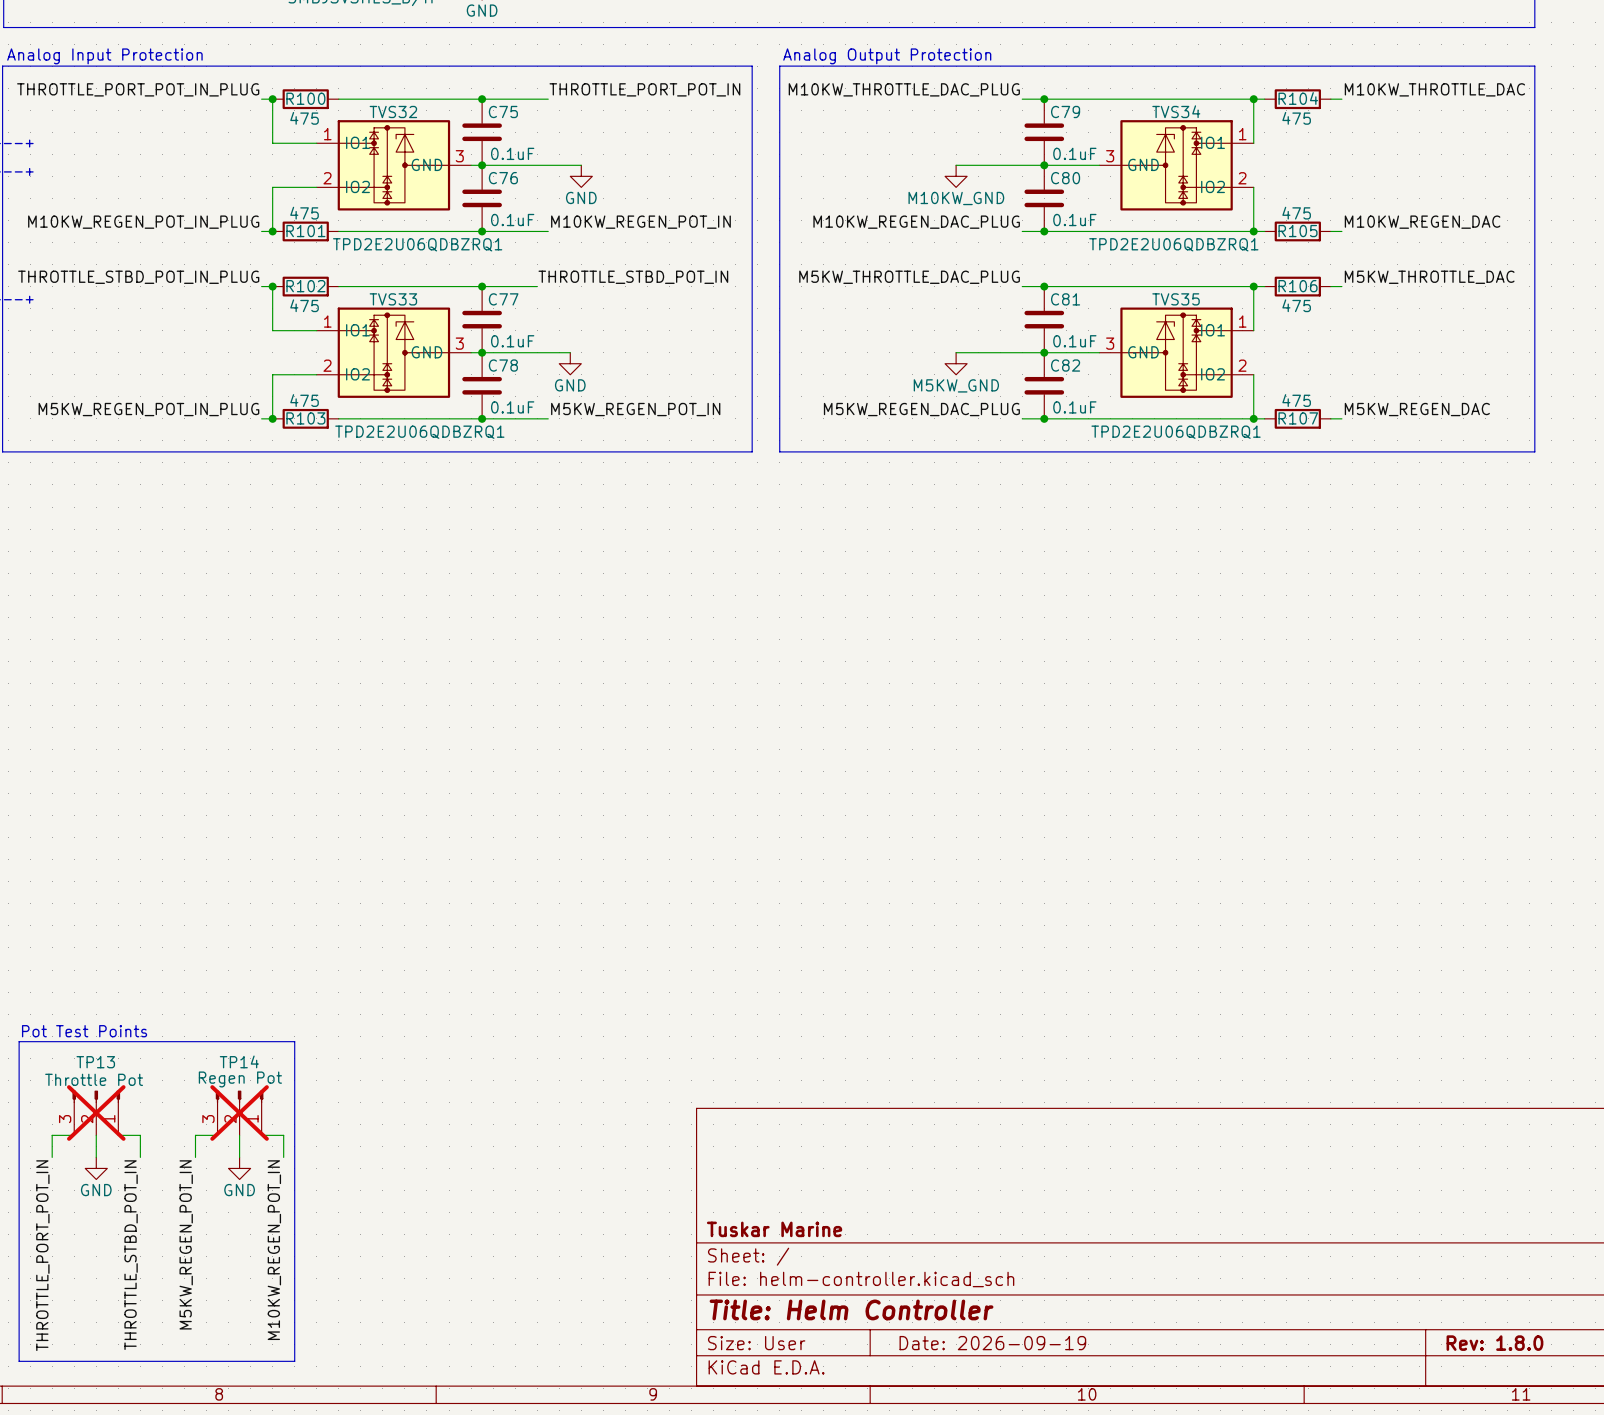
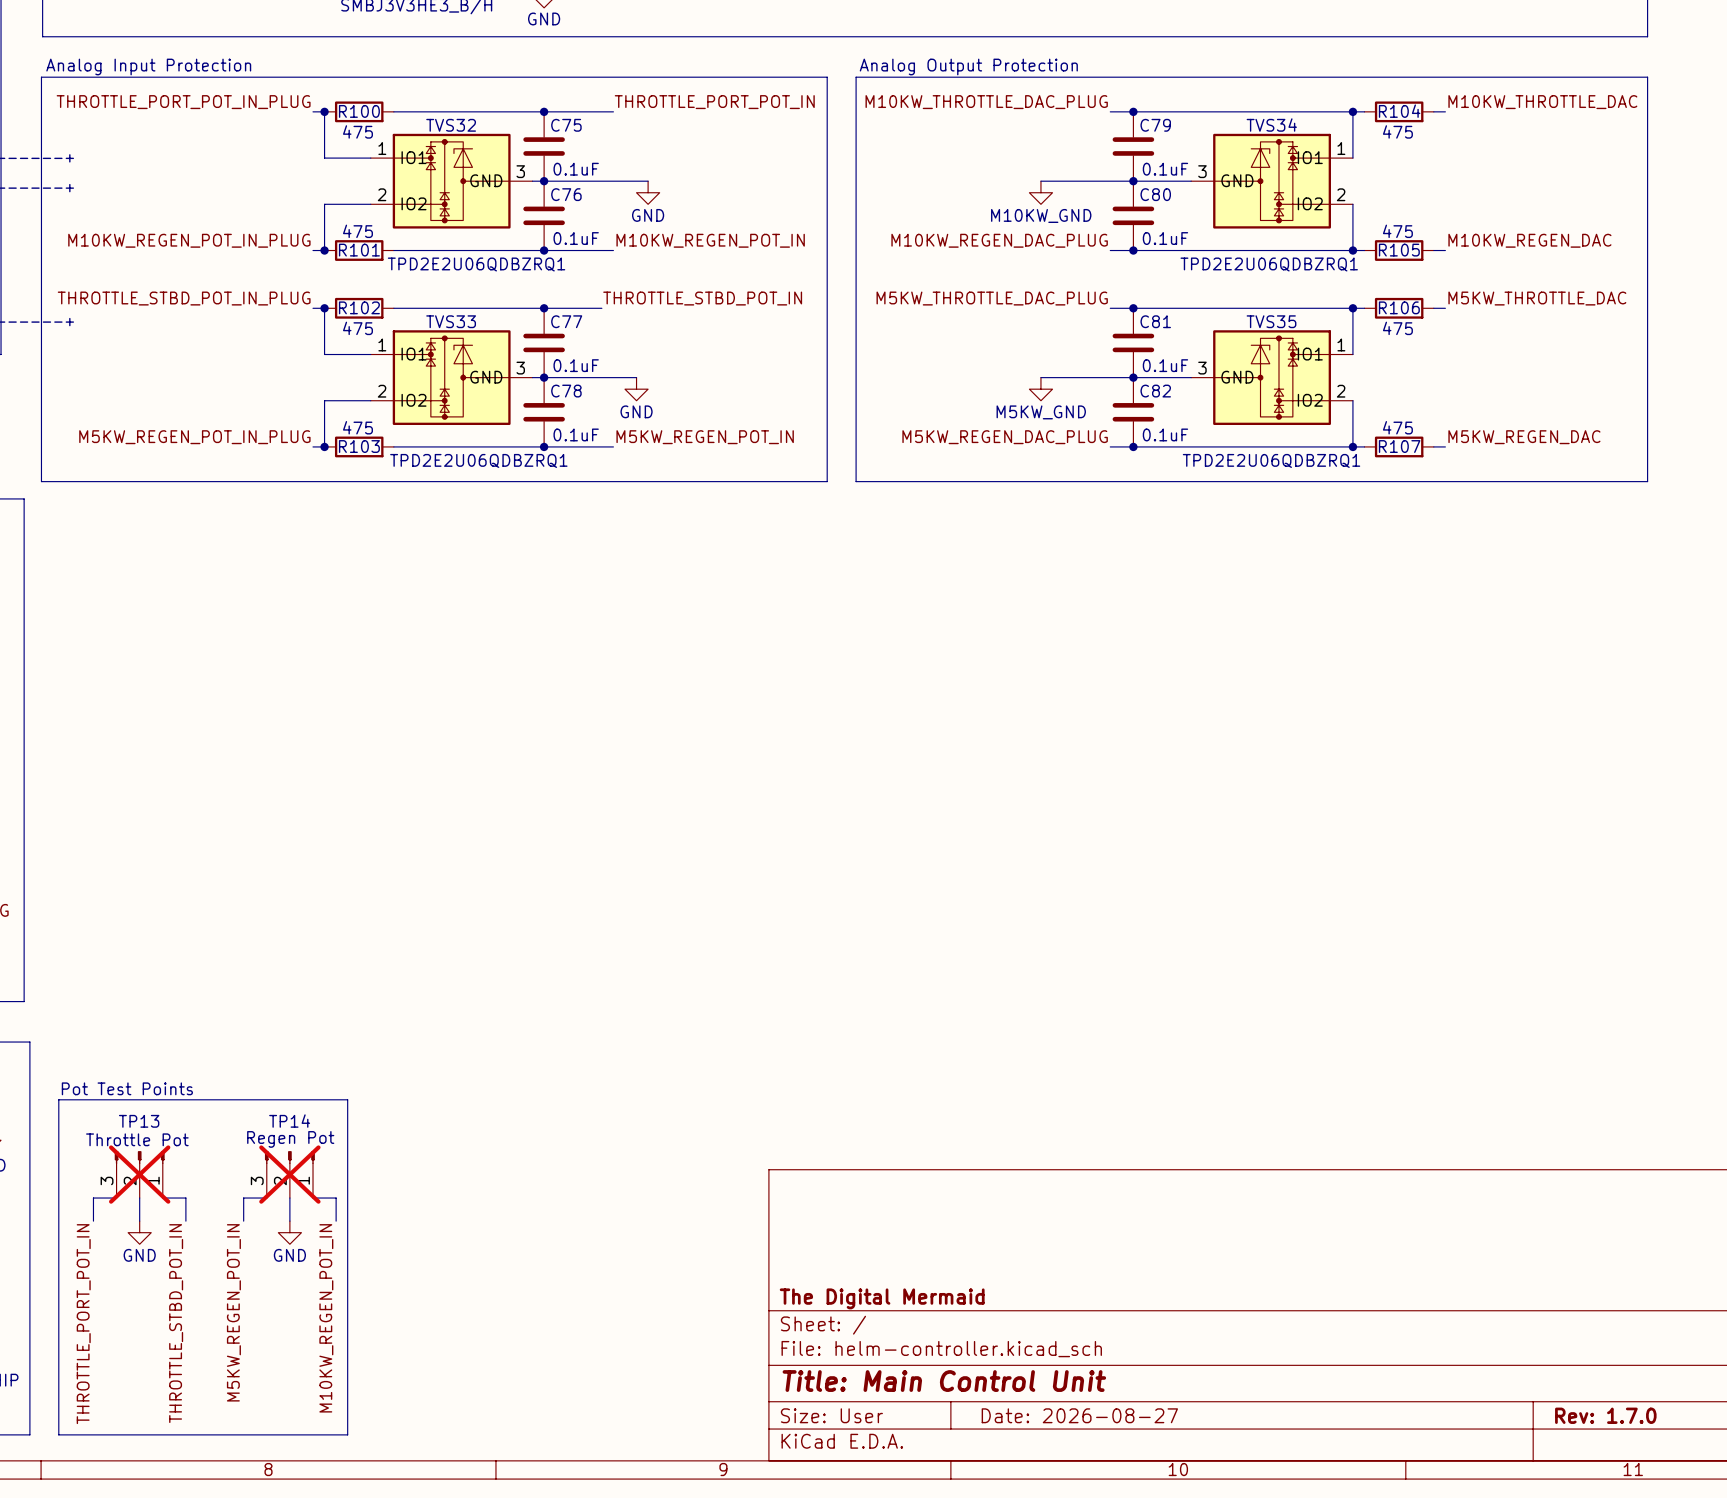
title block: Tuskar Marine (774, 1229) -> The Digital Mermaid (882, 1298)
title block: Title: Helm Controller (851, 1309) -> Title: Main Control Unit (944, 1381)
title block: Date: 2026-09-19 (992, 1343) -> Date: 2026-08-27 (1079, 1415)
title block: Rev: 1.8.0 (1494, 1343) -> Rev: 1.7.0 (1605, 1415)

